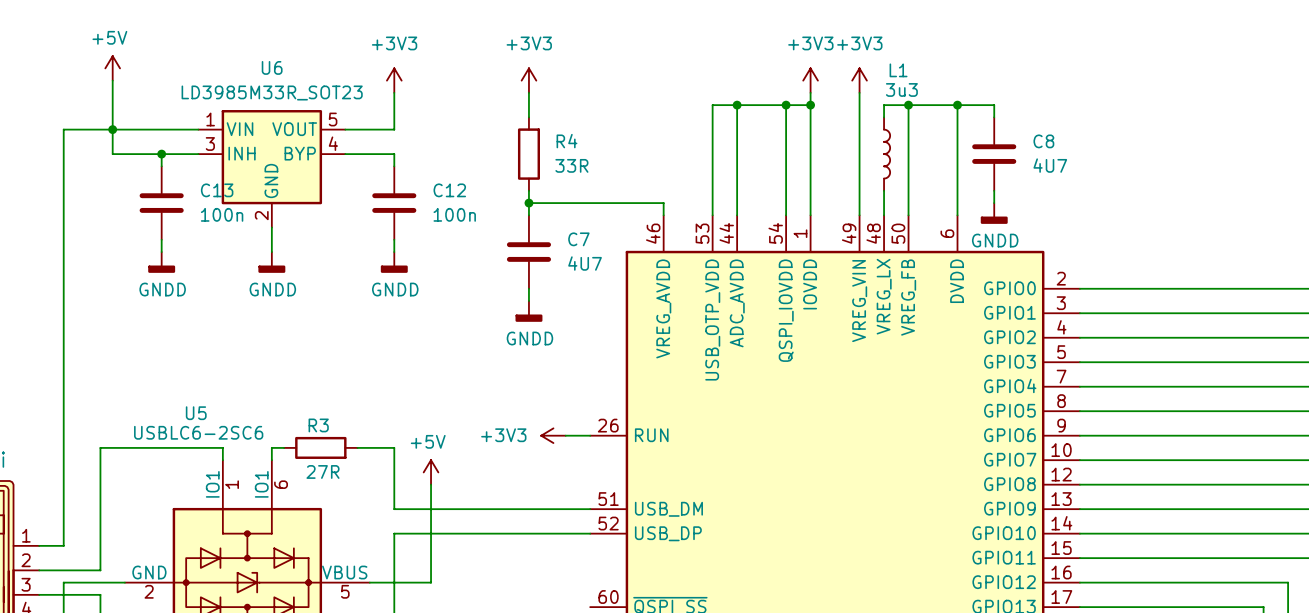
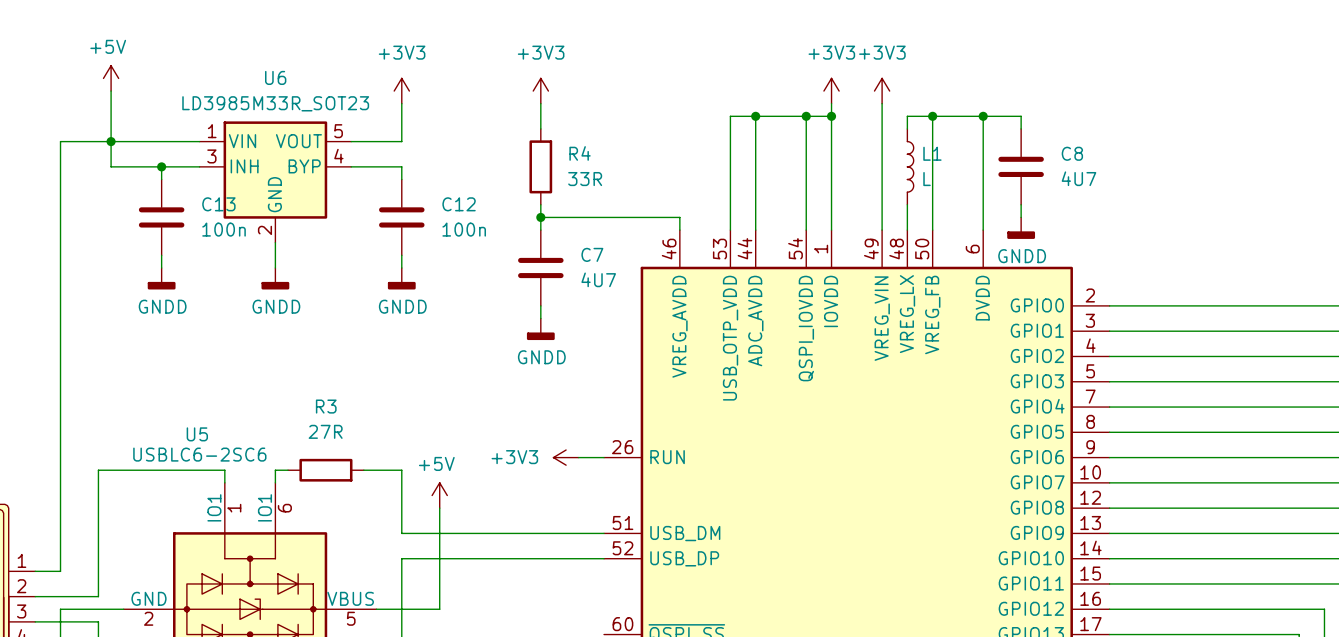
L1 name position: L1 (898, 70) -> L1 (932, 153)
L1 value: 3u3 (901, 89) -> L (927, 179)
R3 name position: R3 (318, 425) -> R3 (326, 406)
R3 value position: 27R (322, 471) -> 27R (325, 431)

